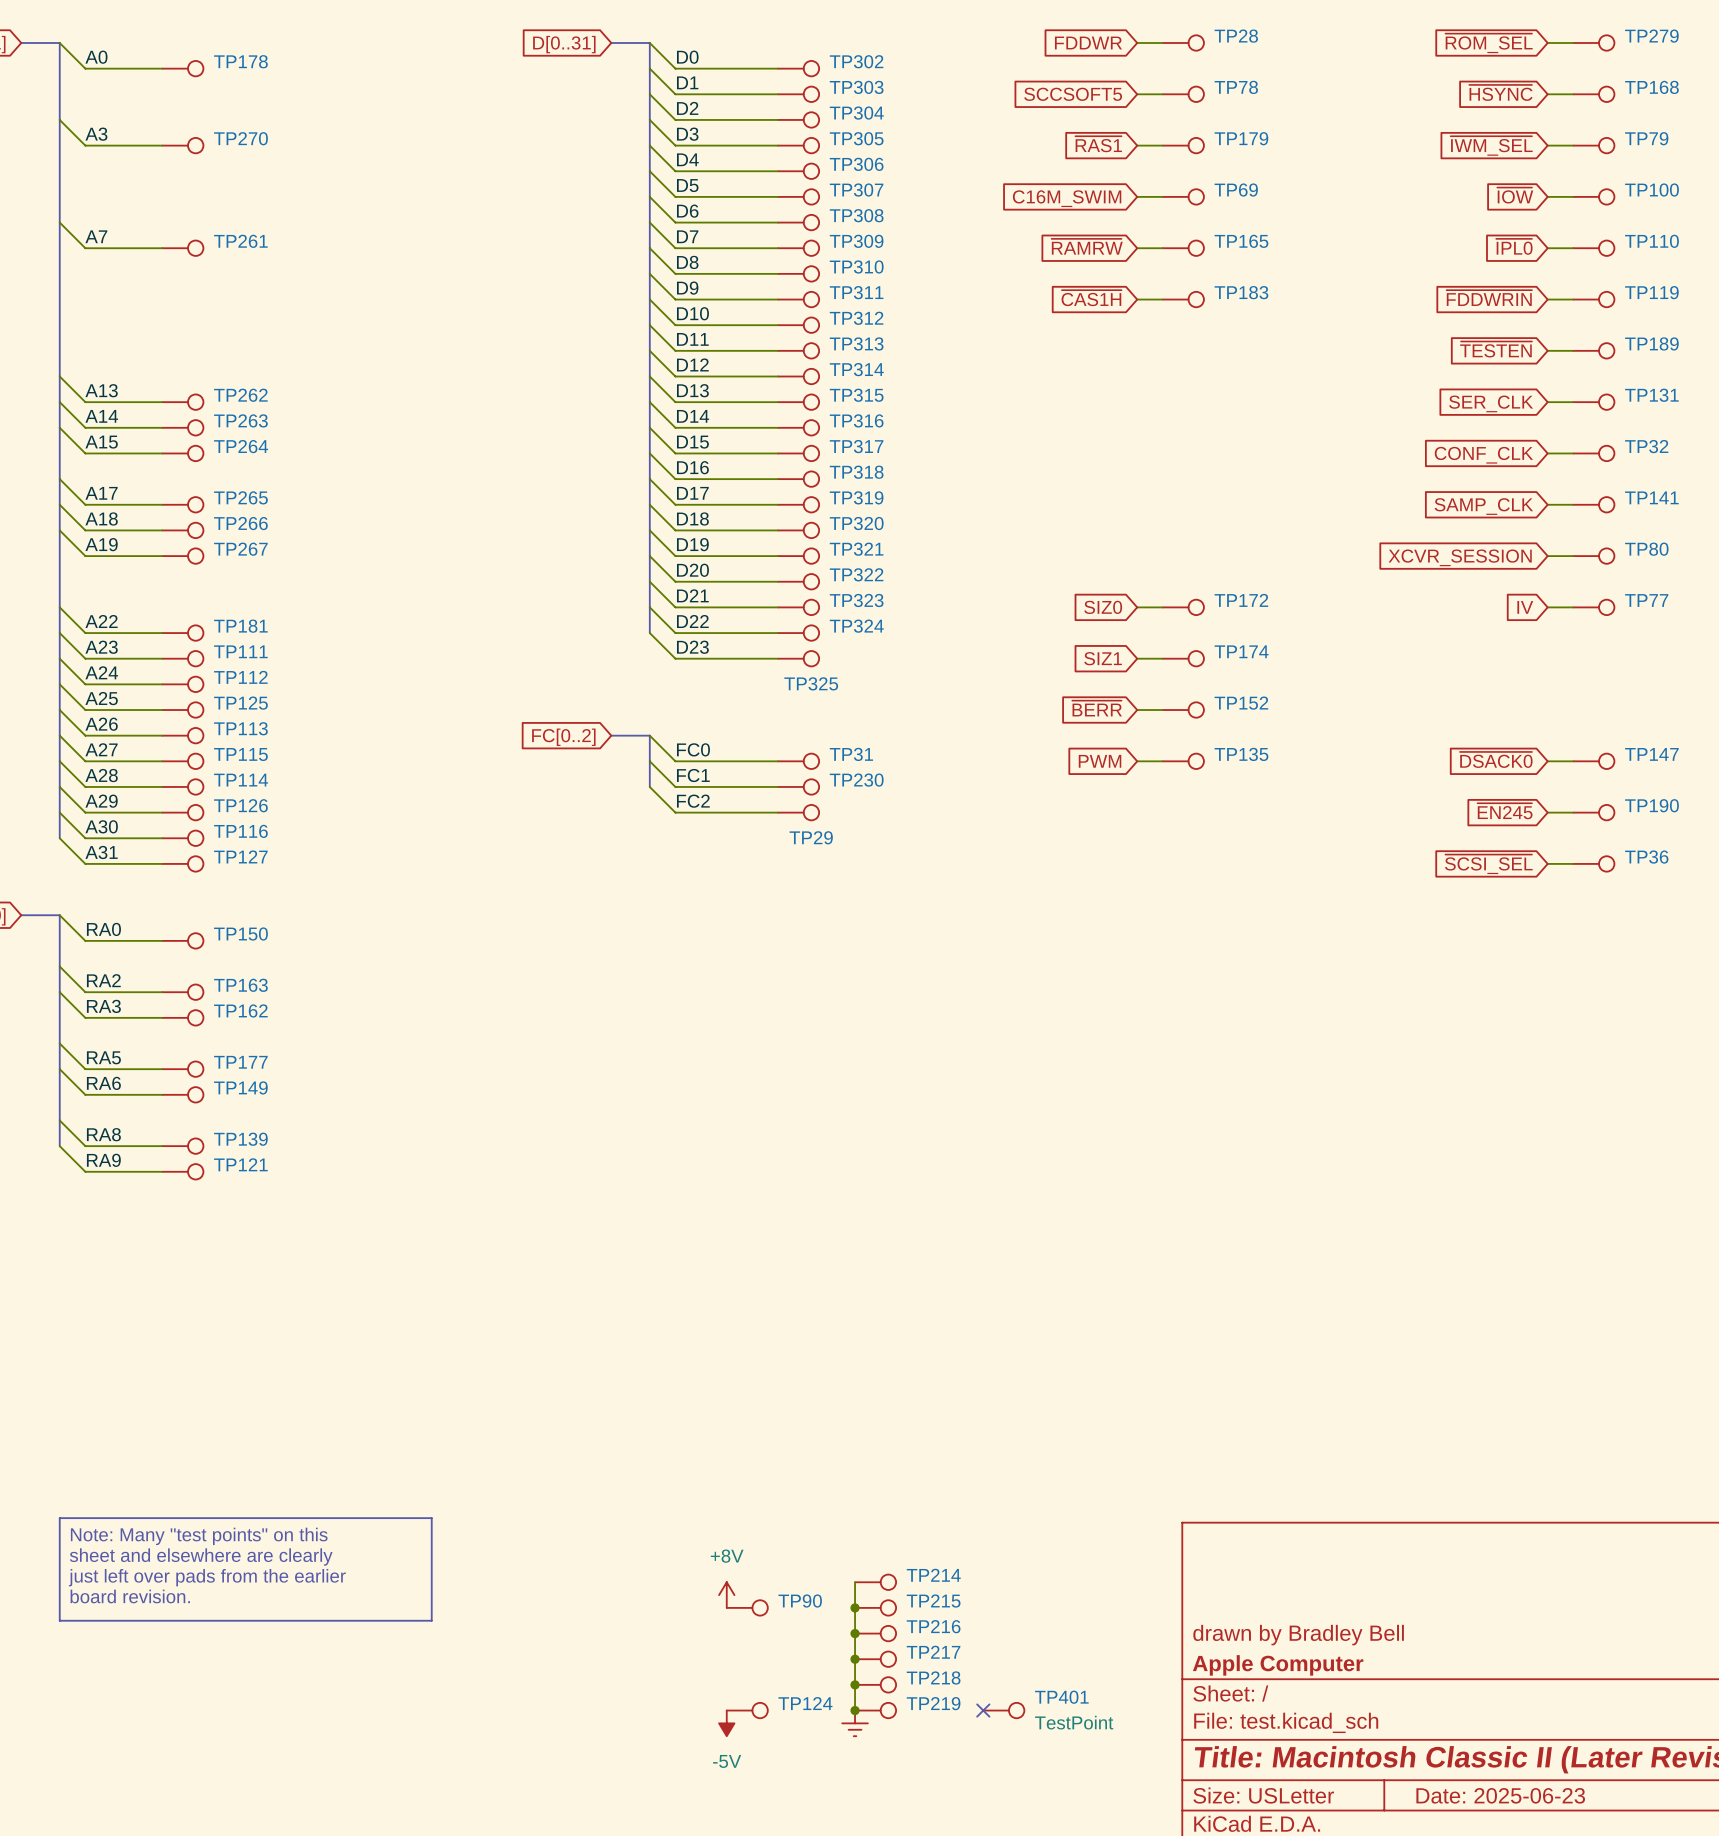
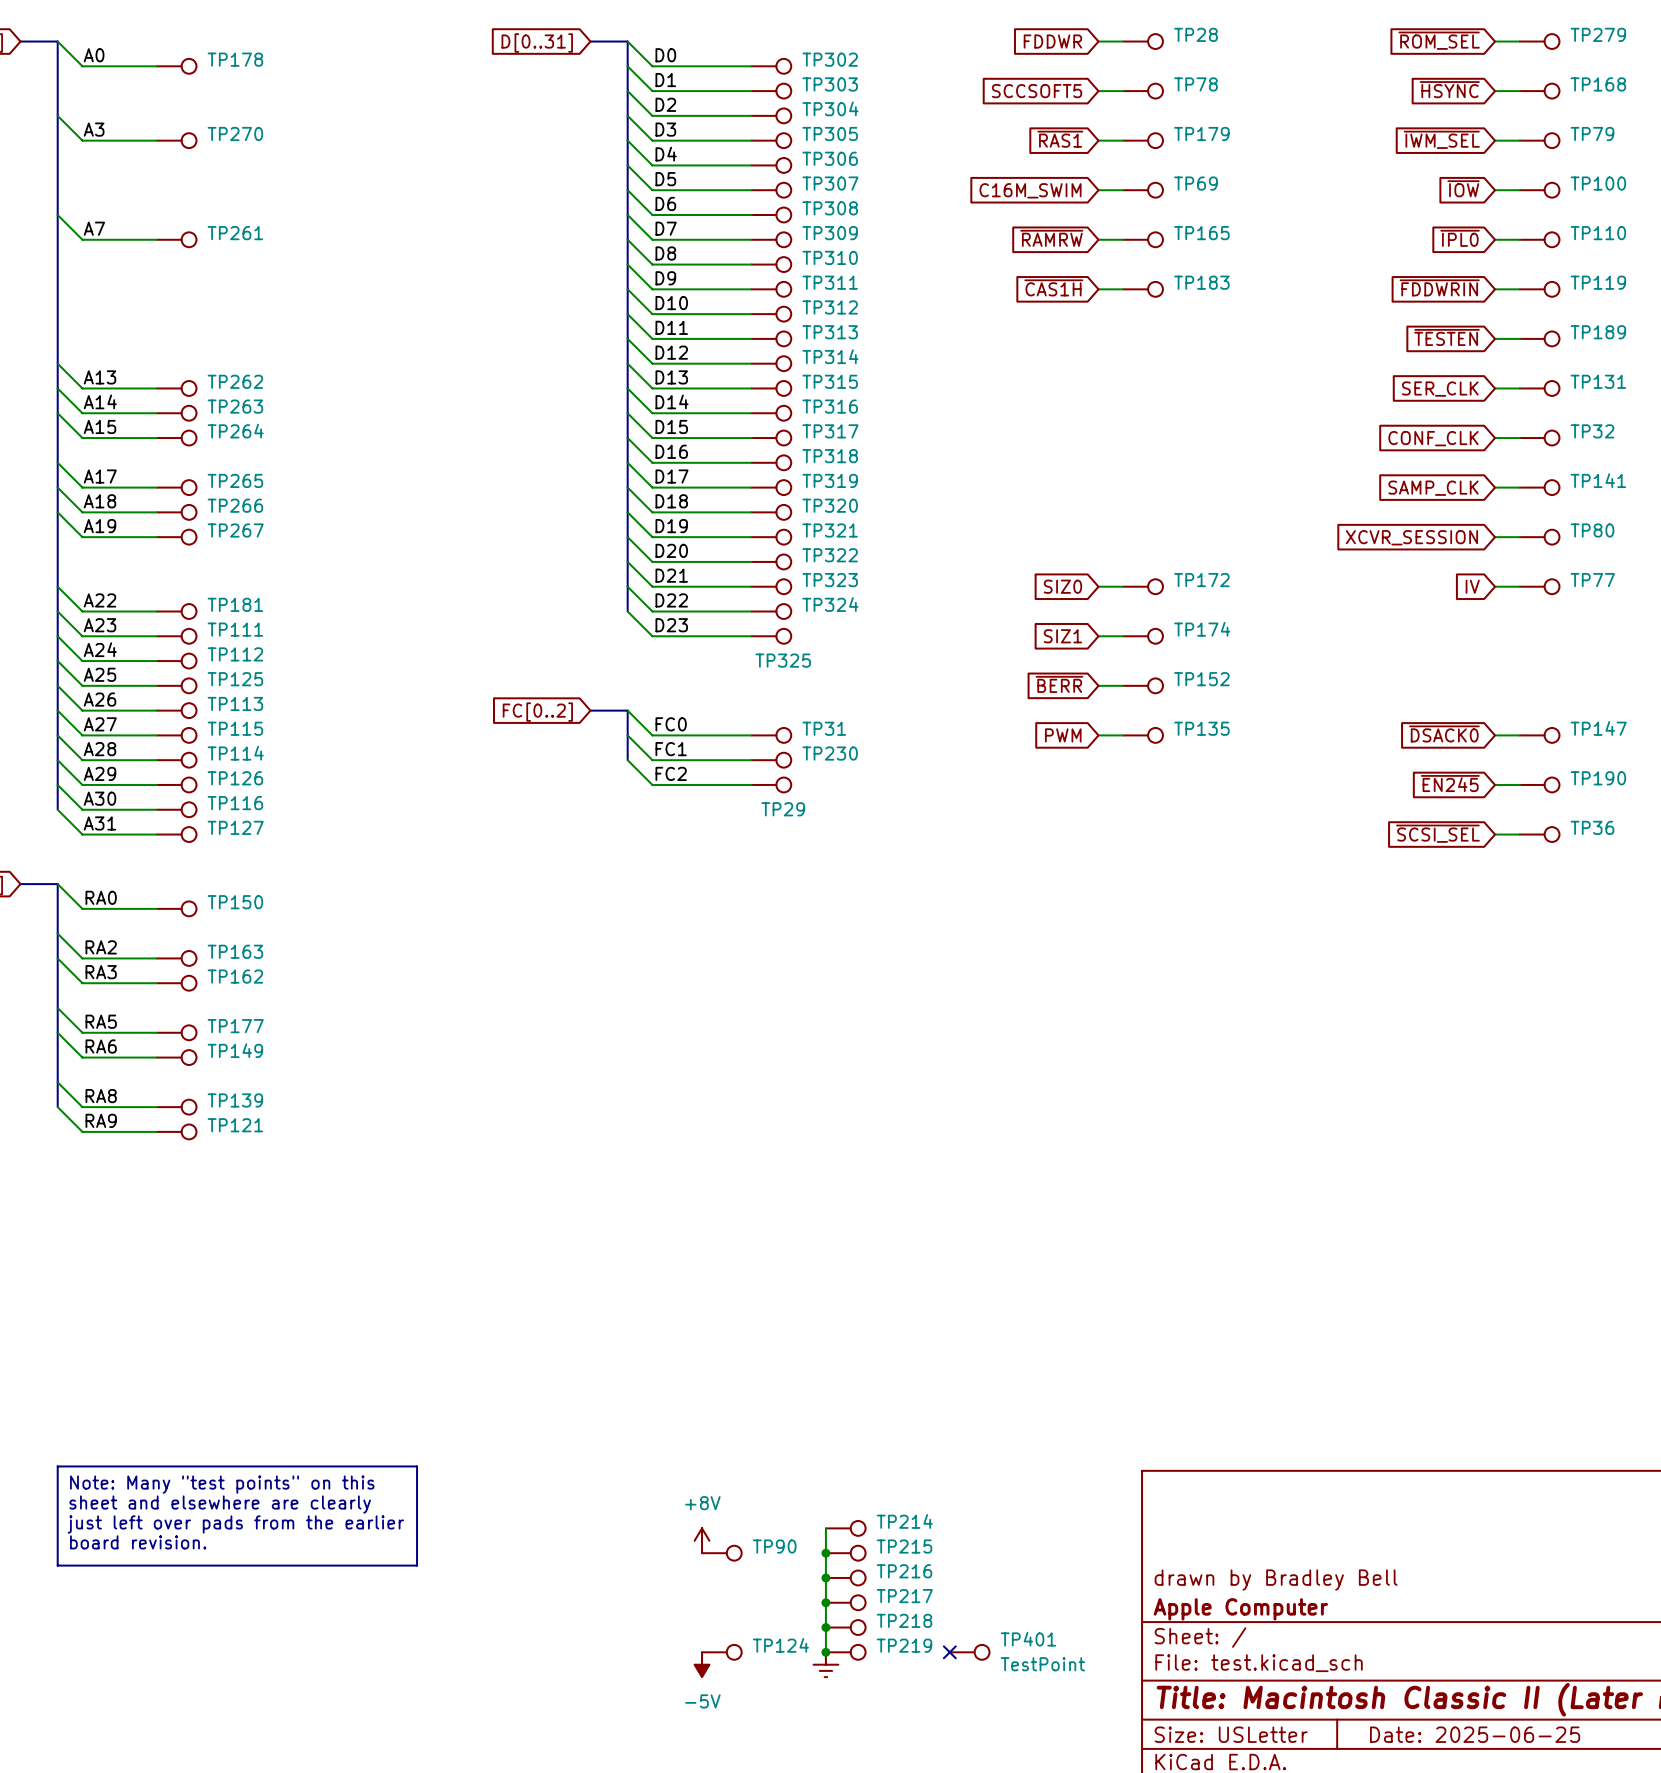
title block: Date: 2025-06-23 (1500, 1795) -> Date: 2025-06-25 (1475, 1734)

